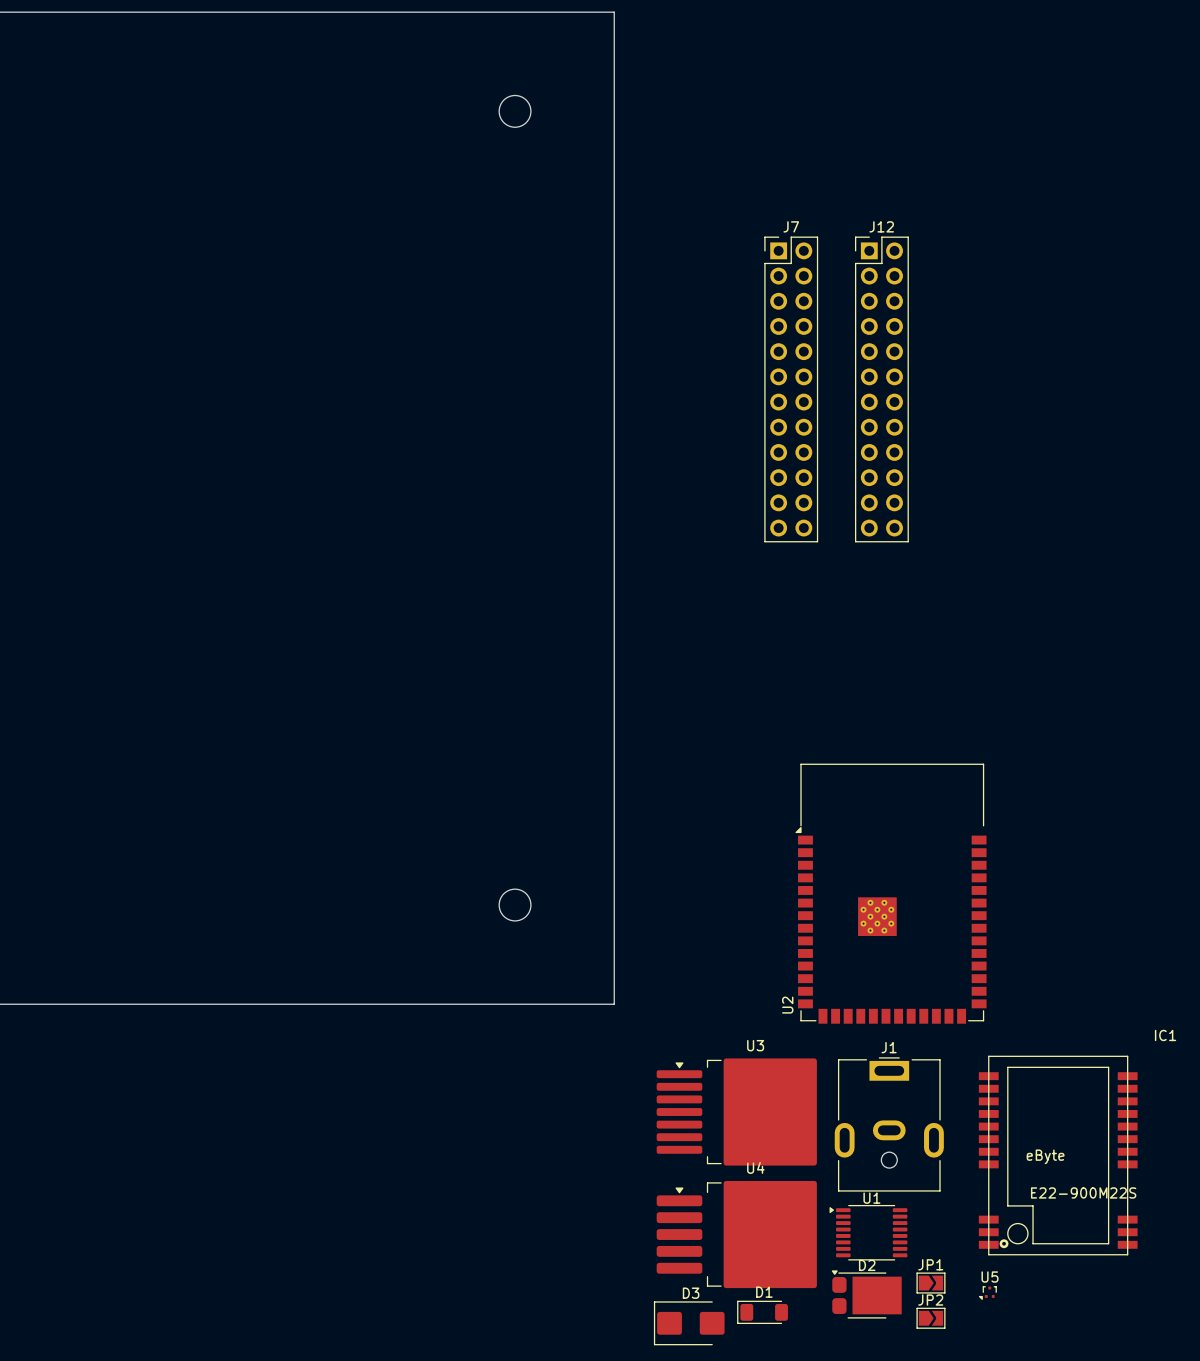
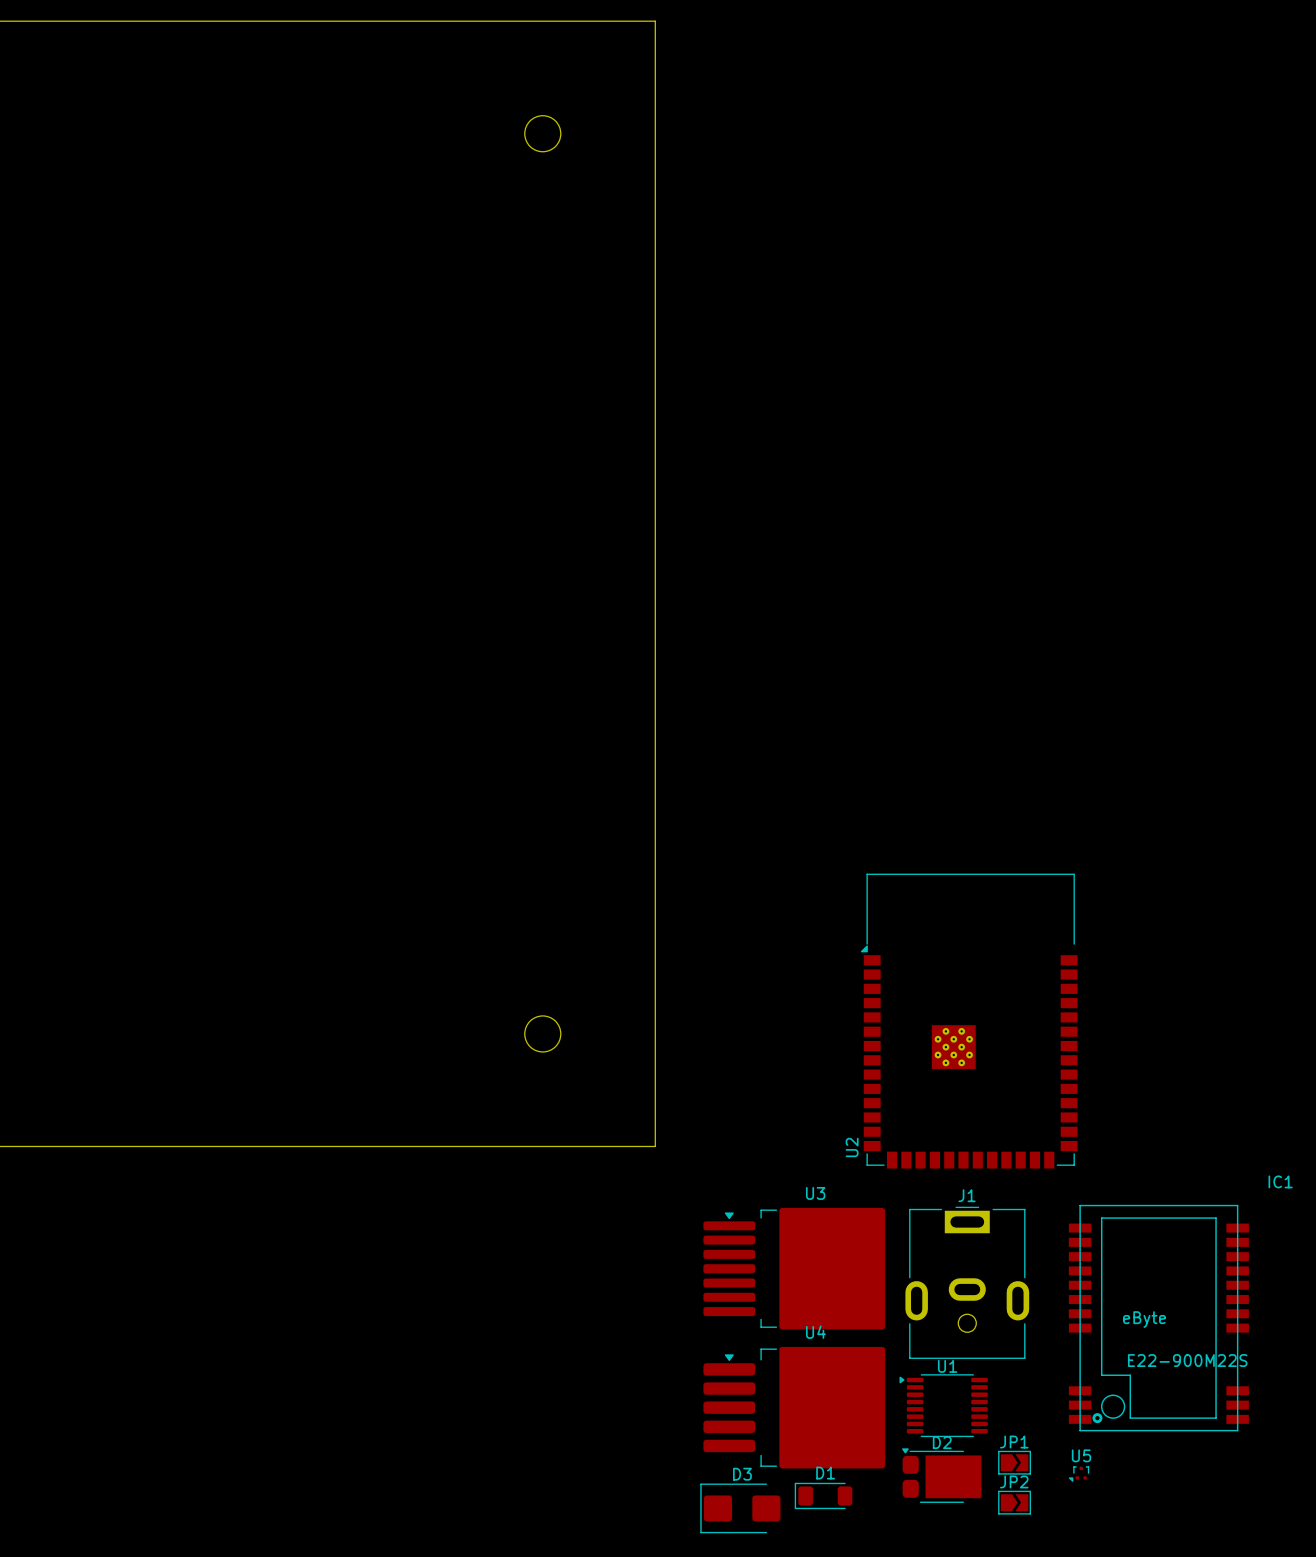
J7: (791, 389) -> none
J12: (881, 389) -> none

